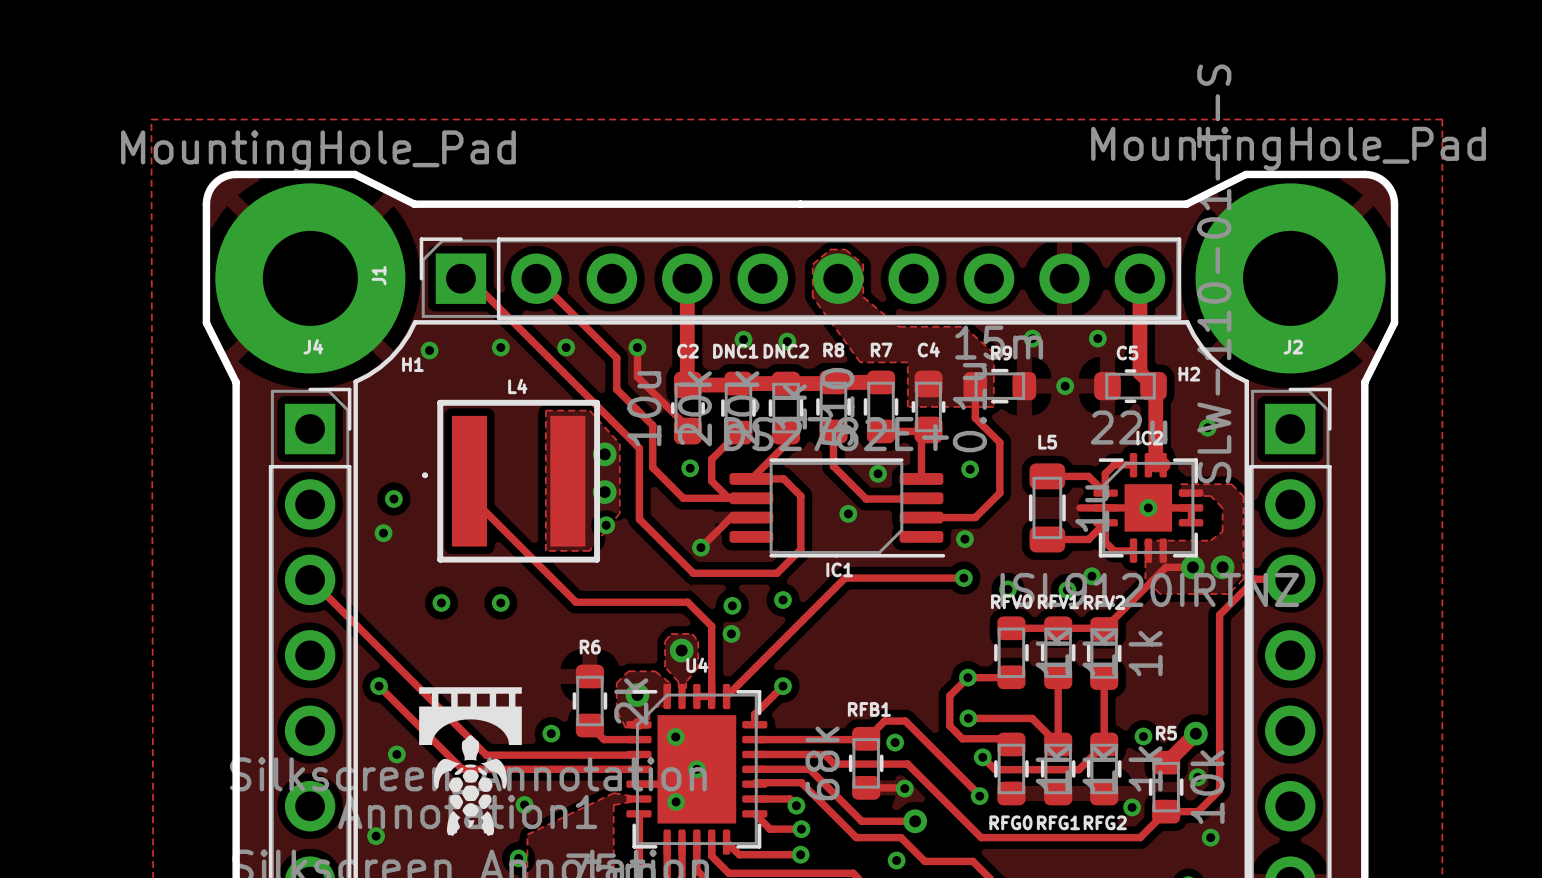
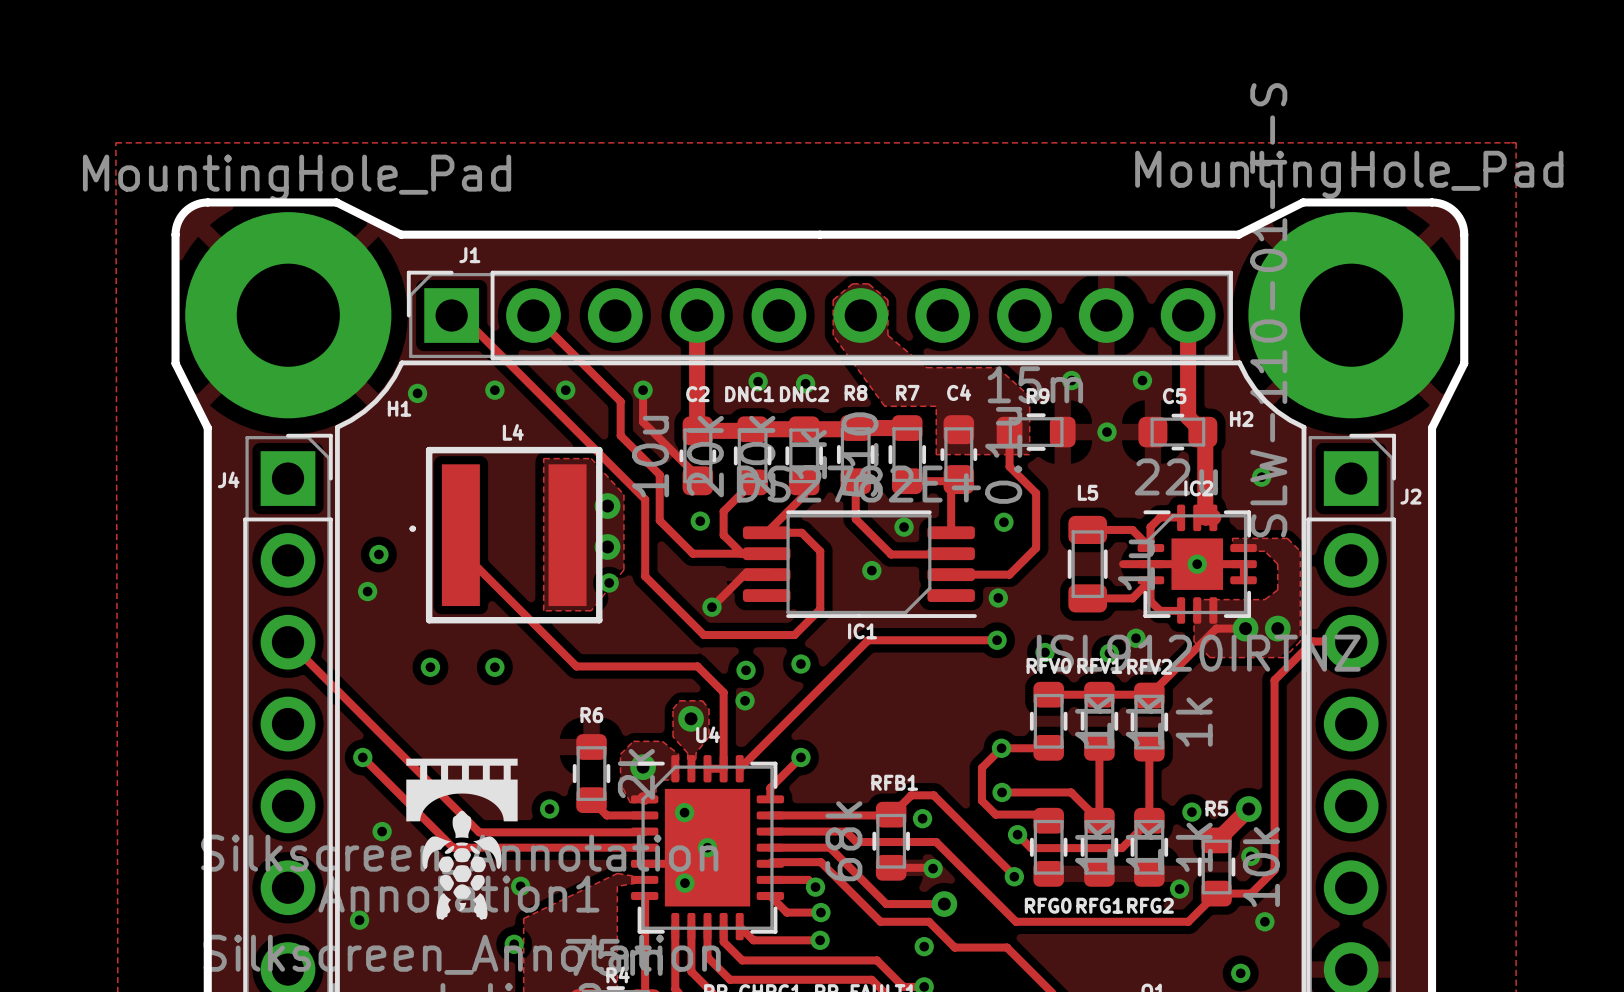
J1 name rotation: 0° (379, 275) -> 90° clockwise (469, 255)
J1 name position: J1 (379, 275) -> J1 (469, 255)
J4 name position: J4 (313, 346) -> J4 (228, 479)
J2 name position: J2 (1293, 347) -> J2 (1410, 496)

